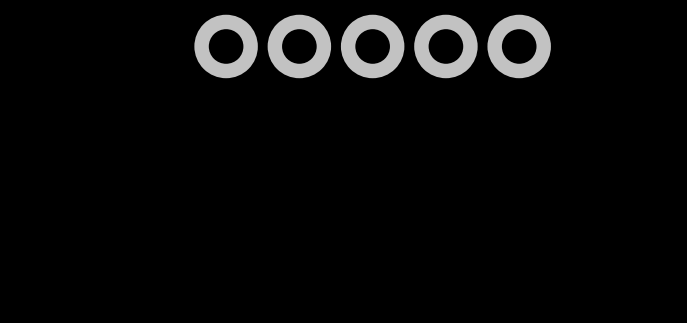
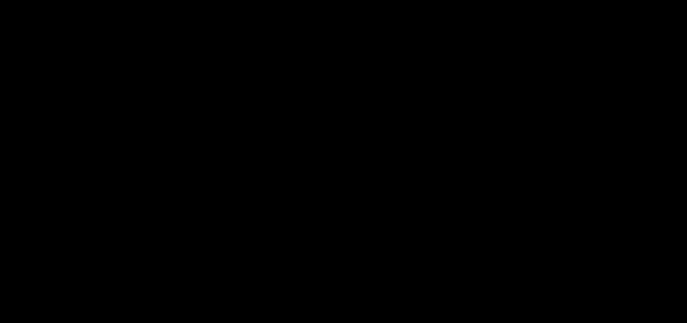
via: (226, 46) -> none
via: (299, 46) -> none
via: (372, 46) -> none
via: (445, 46) -> none
via: (519, 46) -> none

